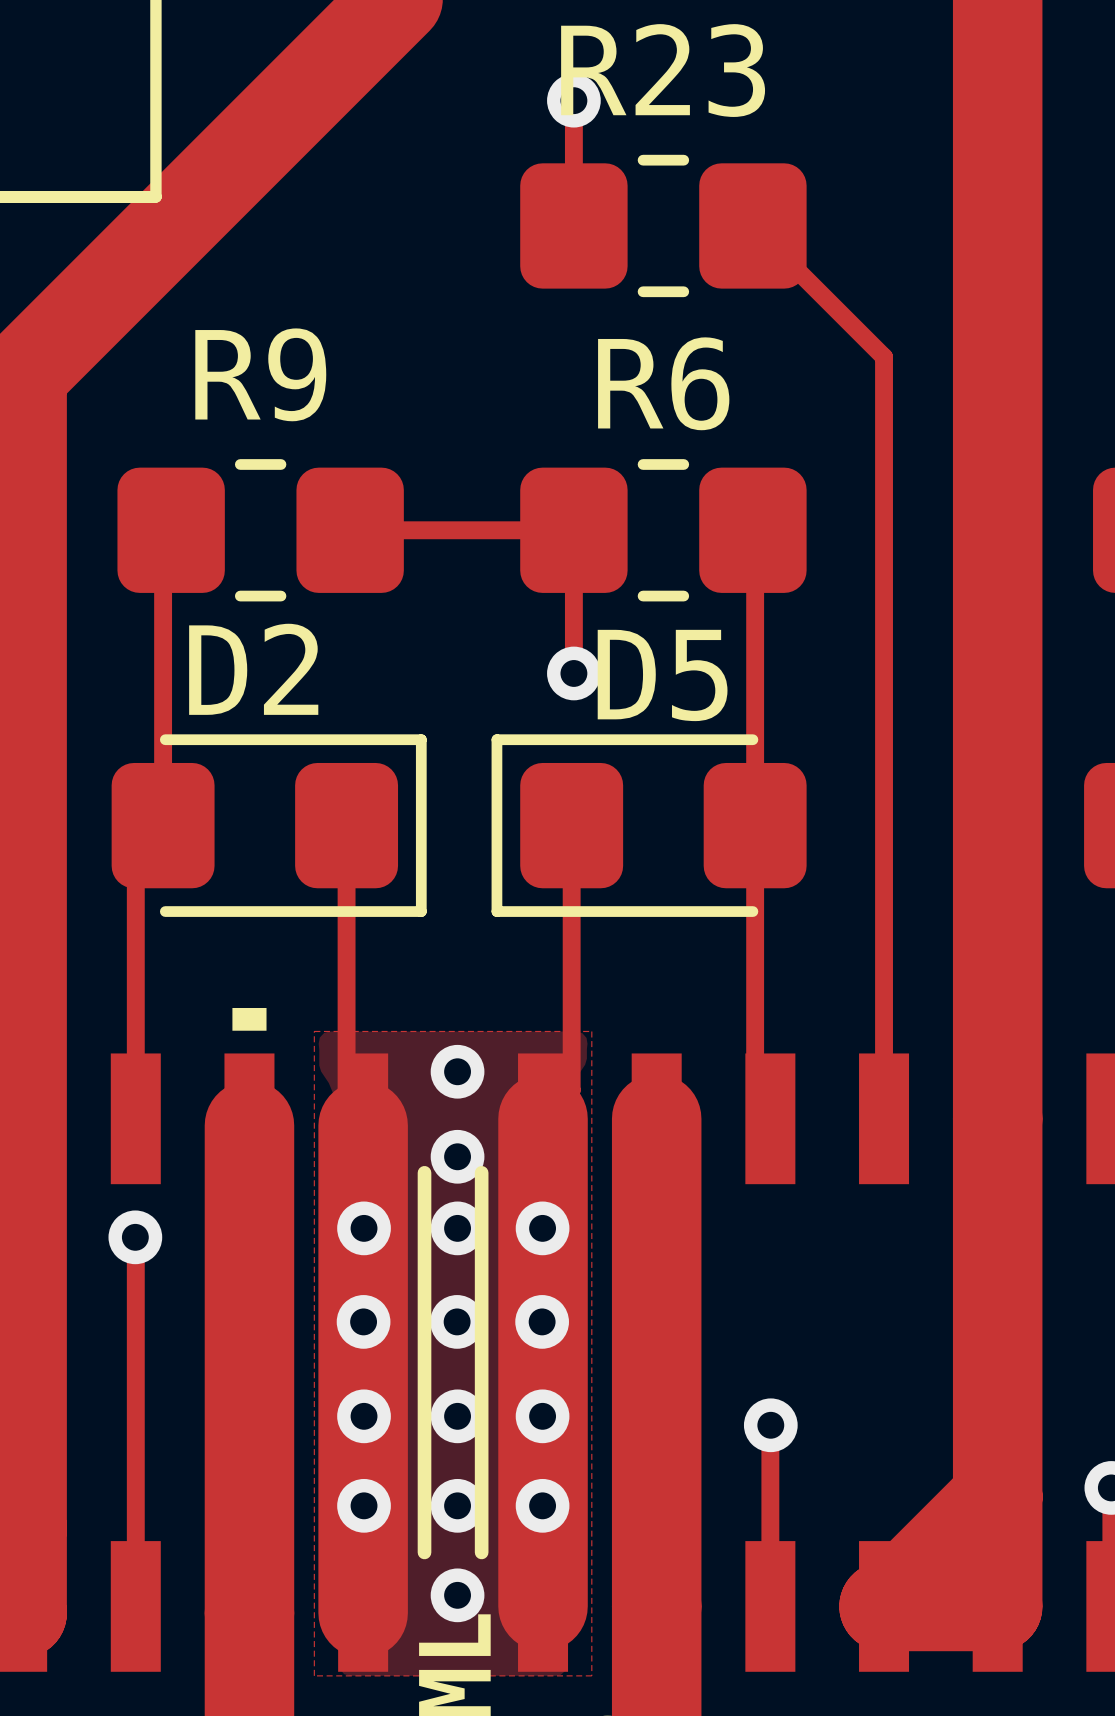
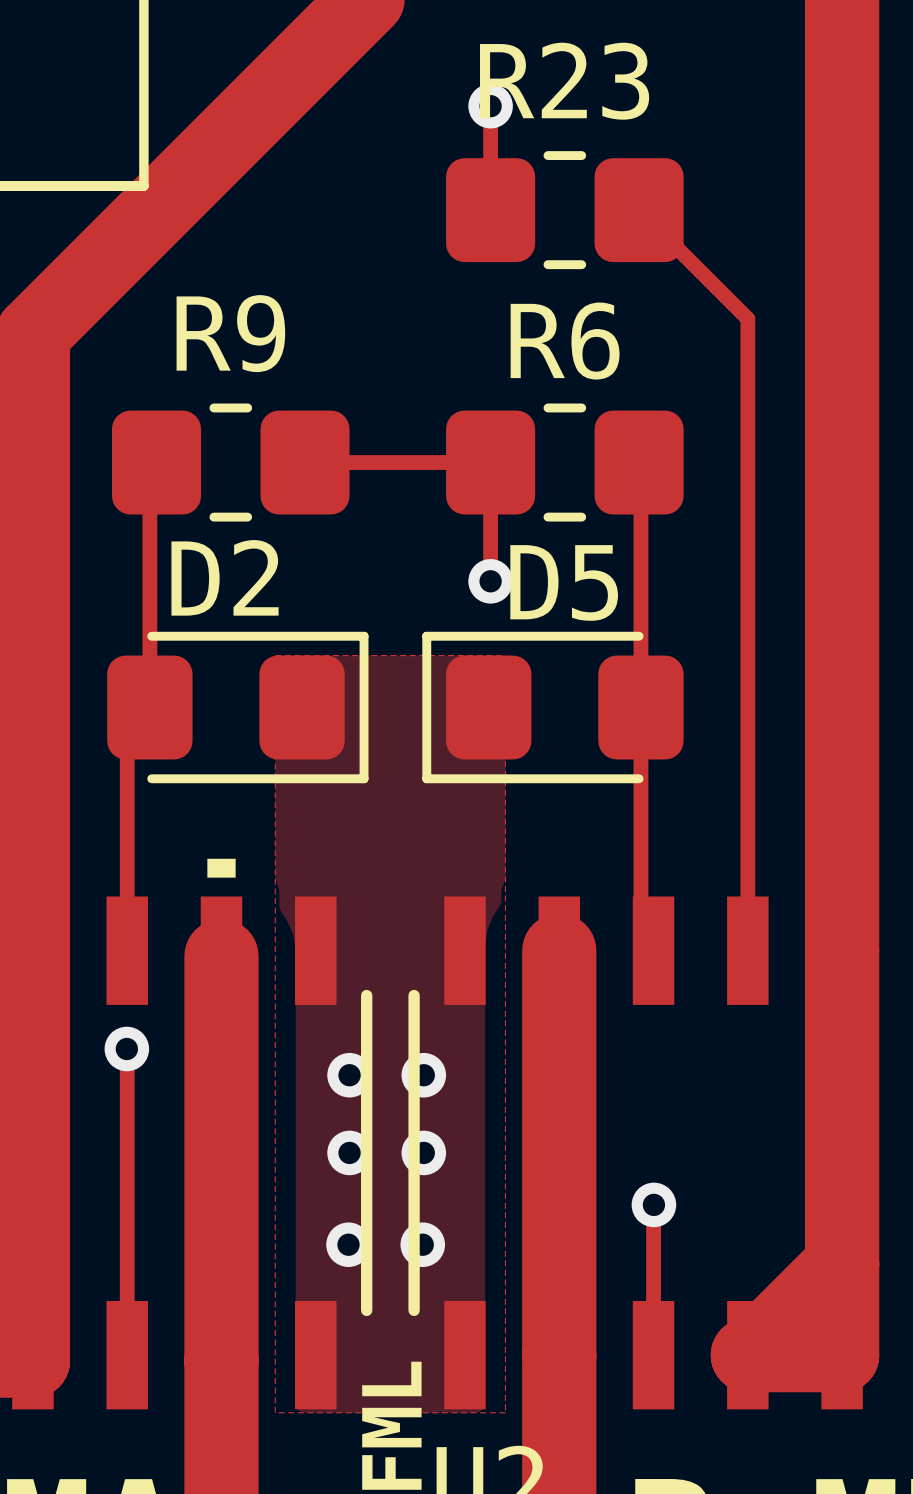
track: (346, 825) (346, 1108) (363, 1125) (363, 1613) -> none
track: (571, 825) (571, 1090) (543, 1118) (543, 1606) -> none
zone outline: (314, 1031) (591, 1031) -> (275, 878) (275, 655) (505, 655) (505, 878)
via: (457, 1071) -> none
via: (457, 1156) -> none
via: (364, 1228) -> none
via: (457, 1228) -> none
via: (542, 1228) -> none
via: none -> (349, 1075)
via: none -> (423, 1075)
via: (363, 1321) -> none
via: (457, 1321) -> none
via: (542, 1321) -> none
via: none -> (349, 1152)
via: none -> (423, 1152)
via: (364, 1416) -> none
via: (457, 1416) -> none
via: (542, 1416) -> none
via: none -> (422, 1244)
via position: (364, 1505) -> (348, 1244)
via: (457, 1505) -> none
via: (542, 1505) -> none
via: (457, 1595) -> none

